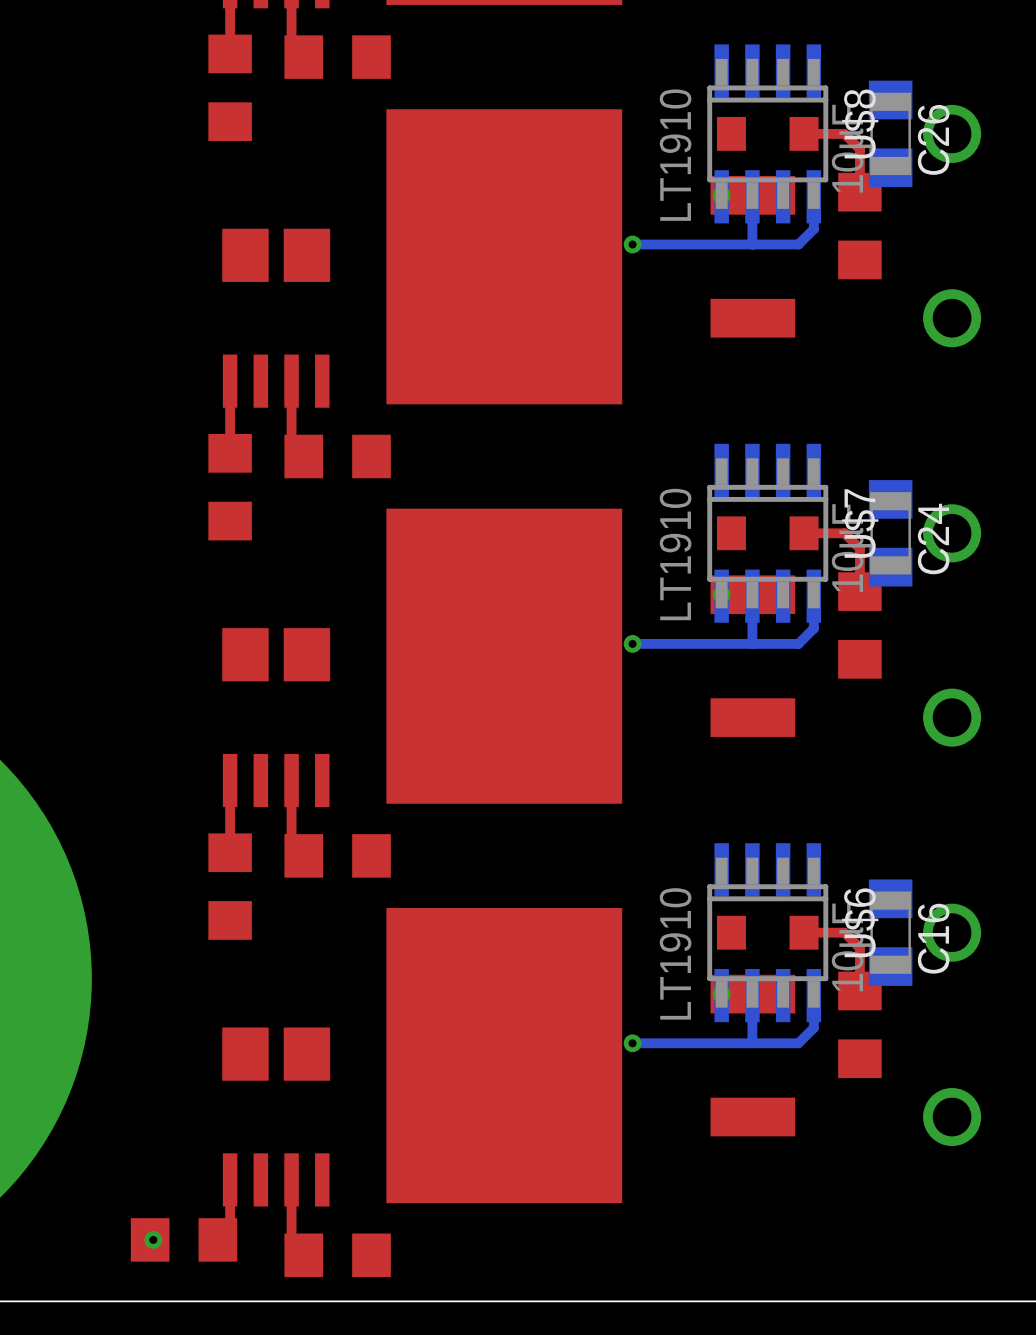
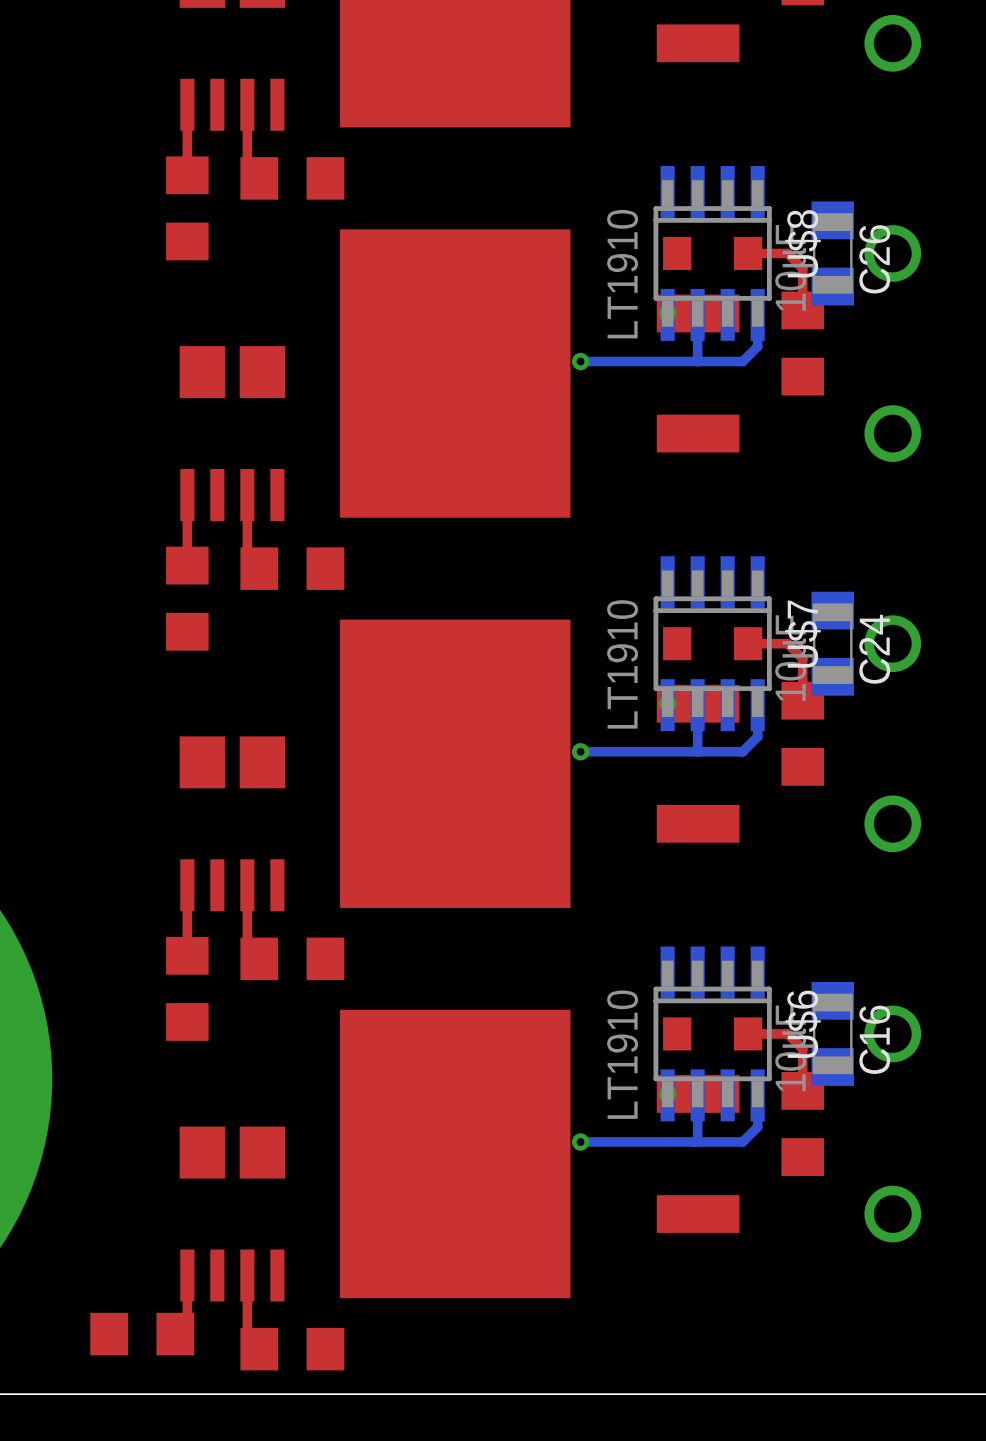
via: (153, 1239) -> none

